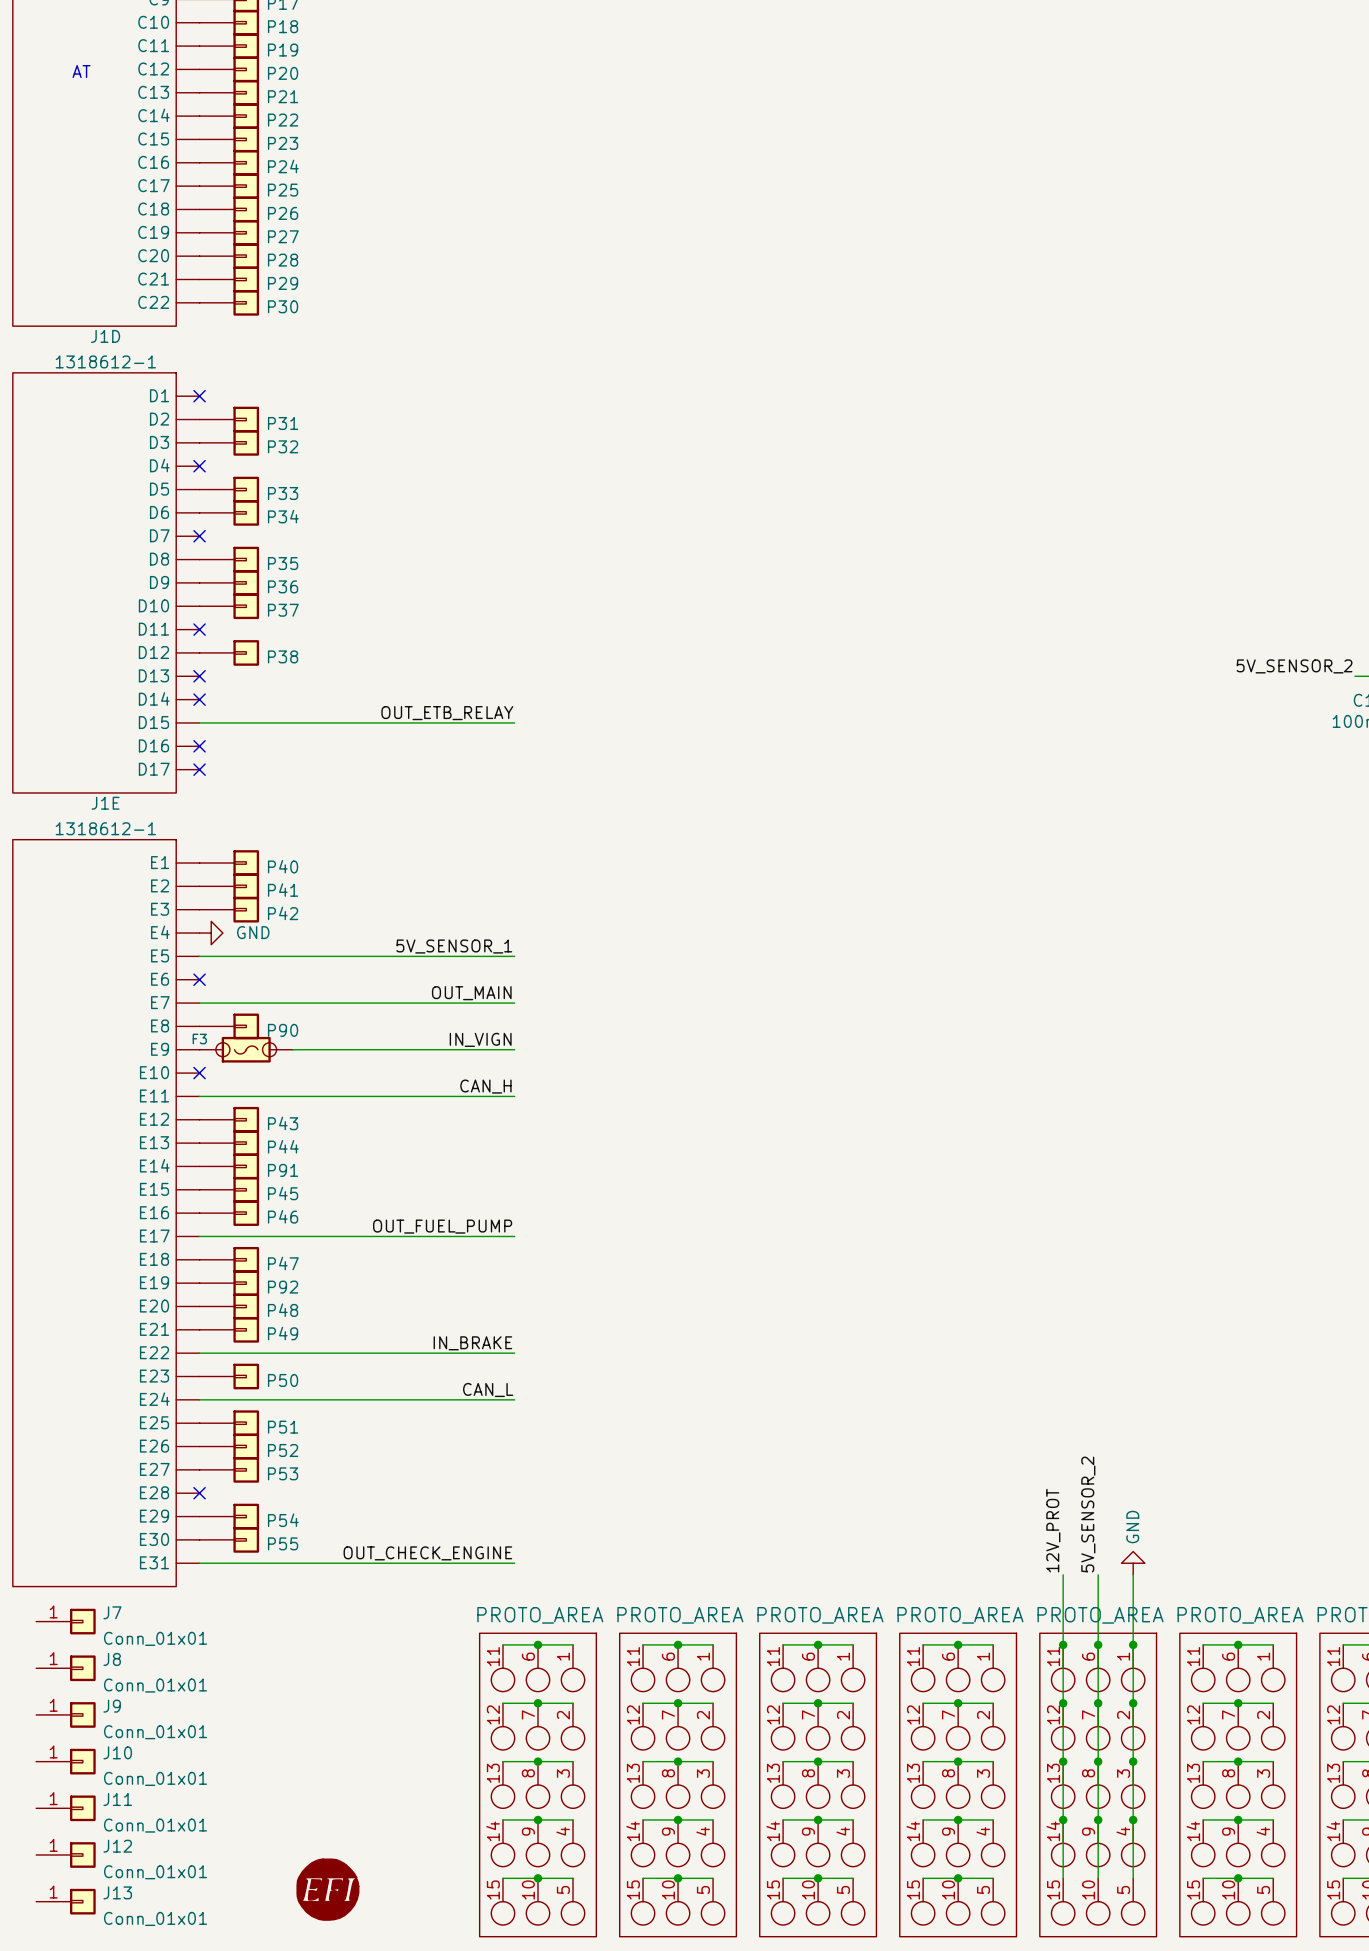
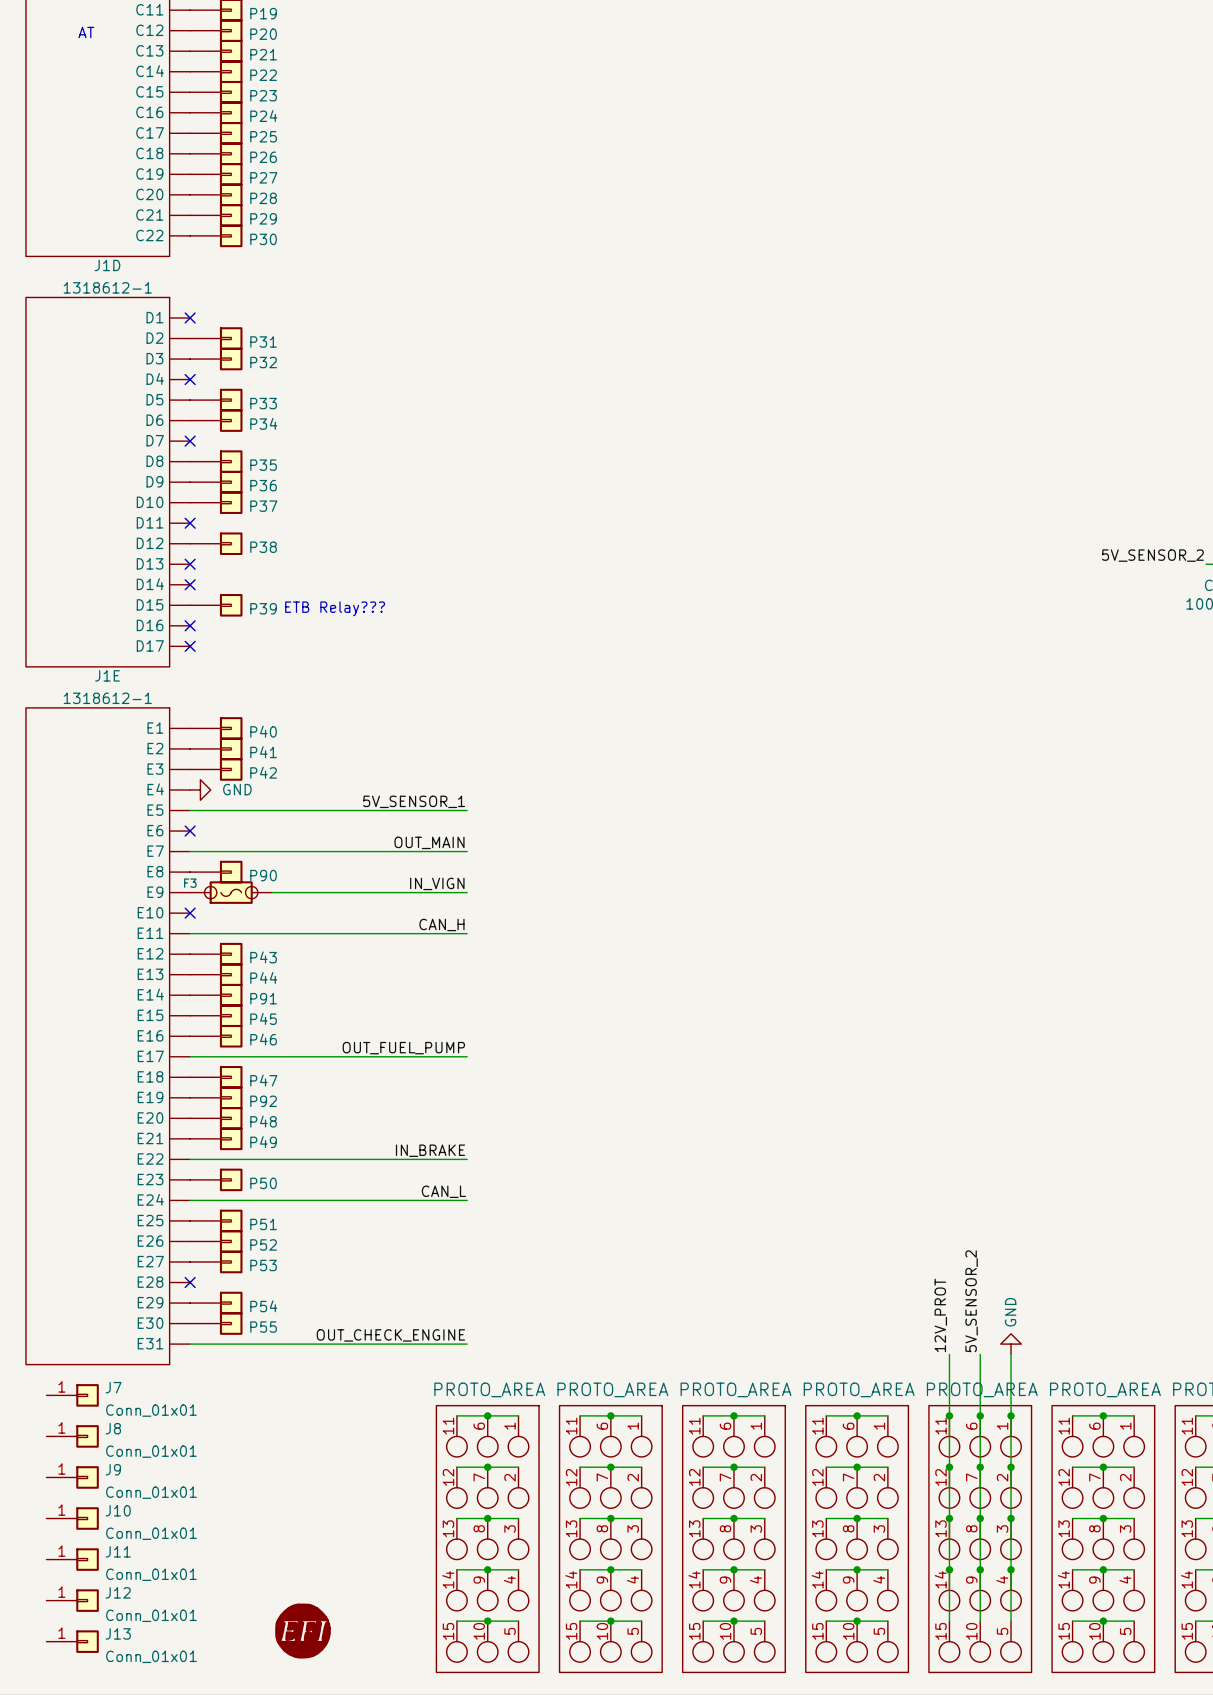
label: OUT_ETB_RELAY (447, 713) -> none
wire: (199, 722) (514, 722) -> none
P39: none -> (216, 605)
text: none -> ETB Relay??? (335, 608)

